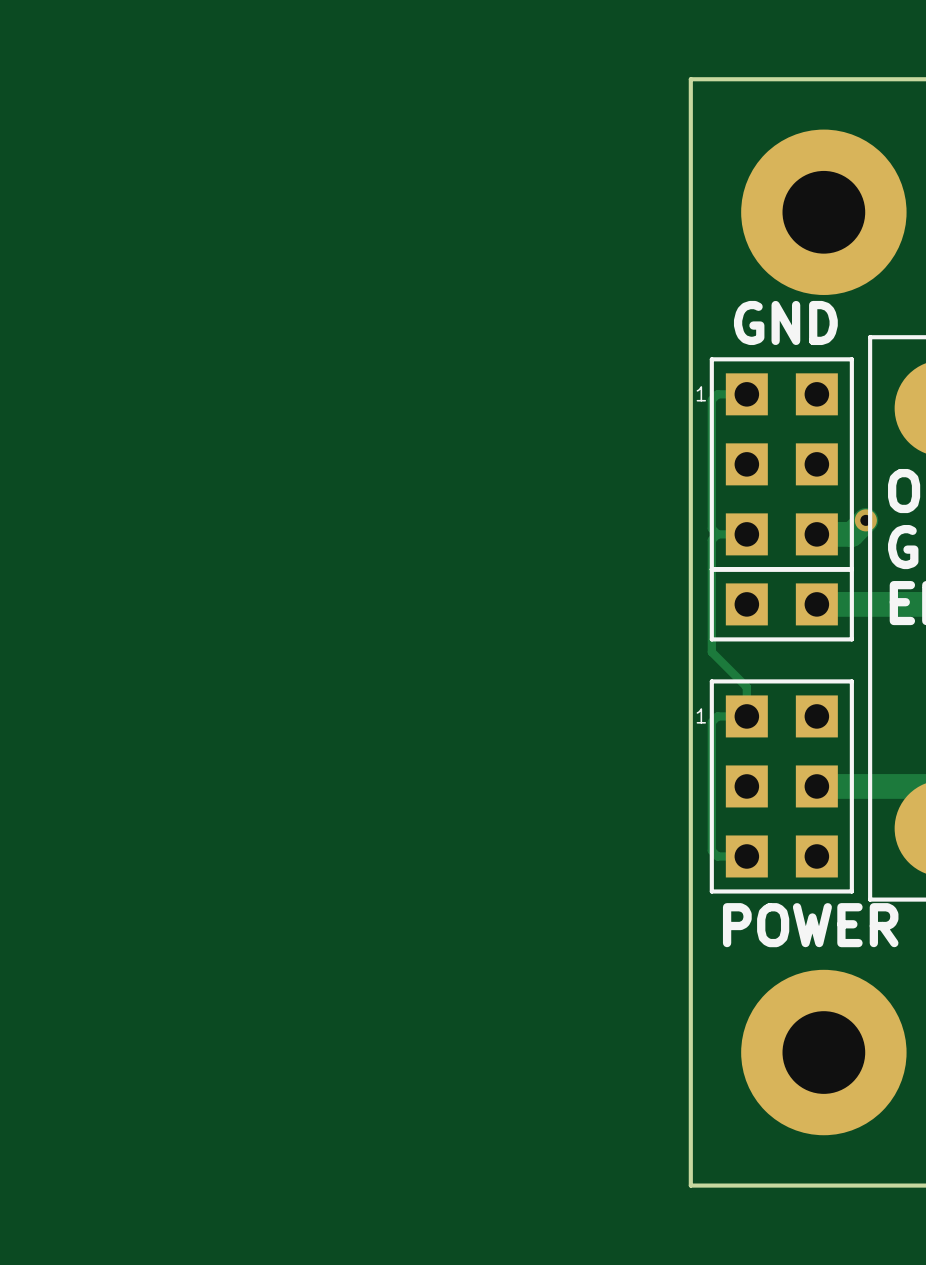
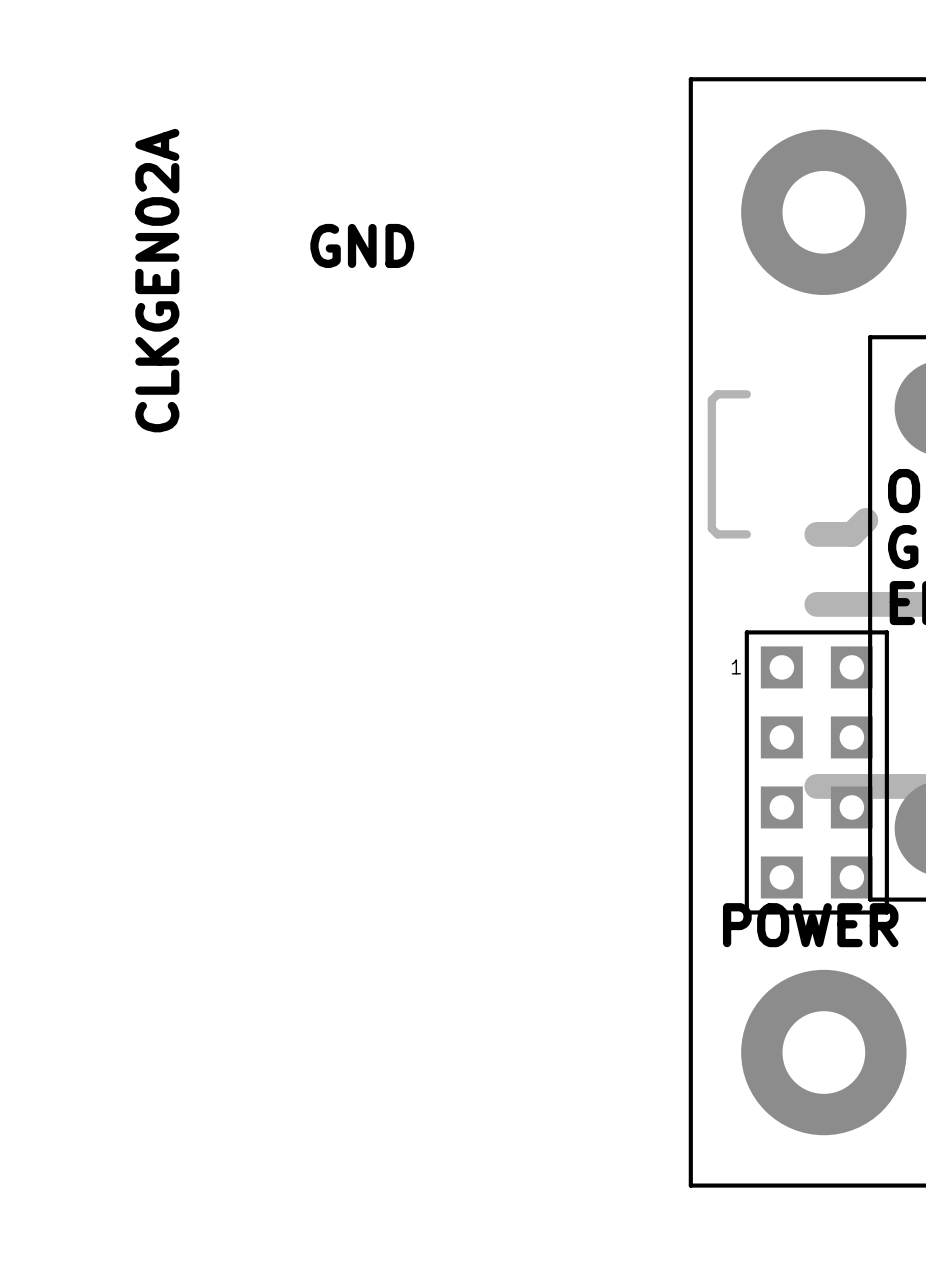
text: none -> CLKGEN02A (157, 280)
text position: GND (785, 322) -> GND (362, 245)
part: (781, 464) -> none
via: (865, 520) -> none
track: (717, 534) (711, 540) (711, 652) (746, 687) (746, 716) (717, 716) (711, 722) (711, 850) (717, 856) (746, 856) -> none
part: (781, 604) -> none
part: none -> (816, 772)
part: (781, 786) -> none

